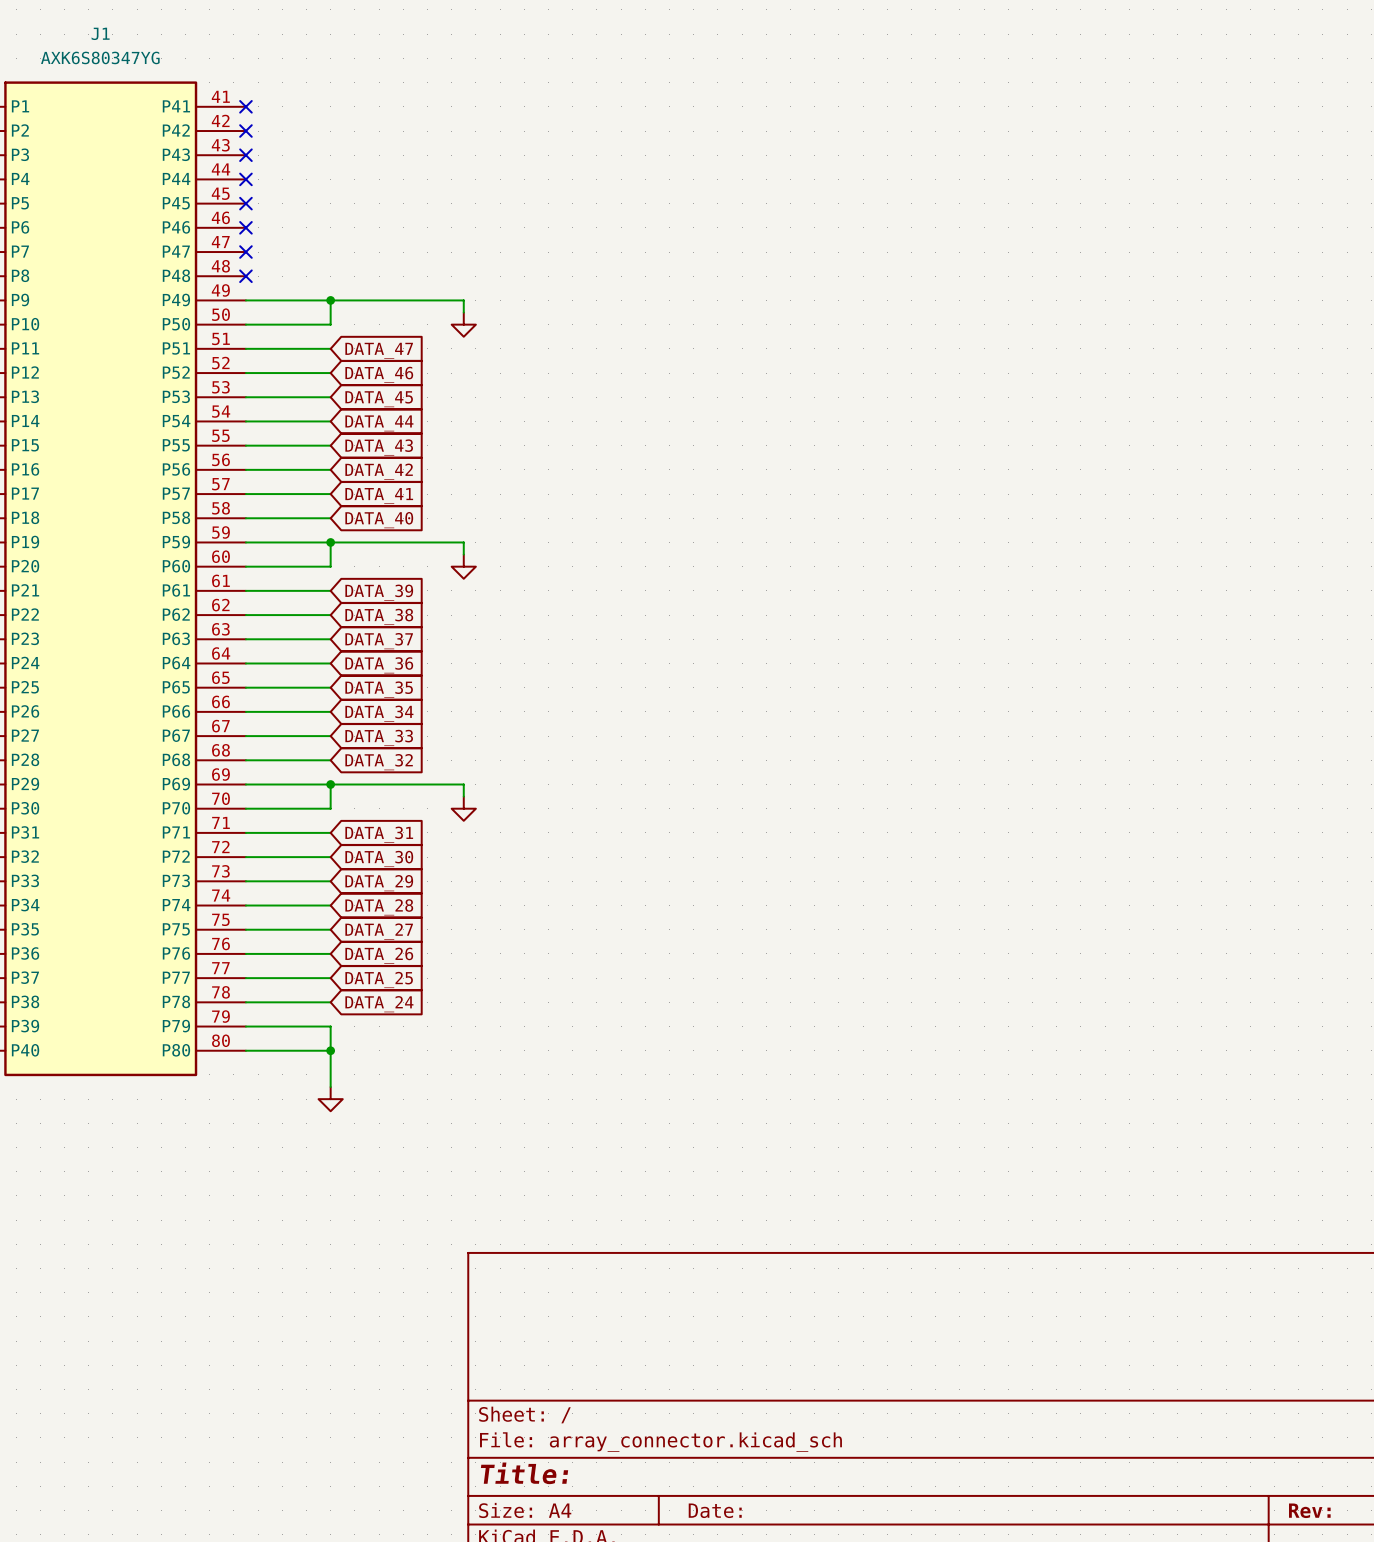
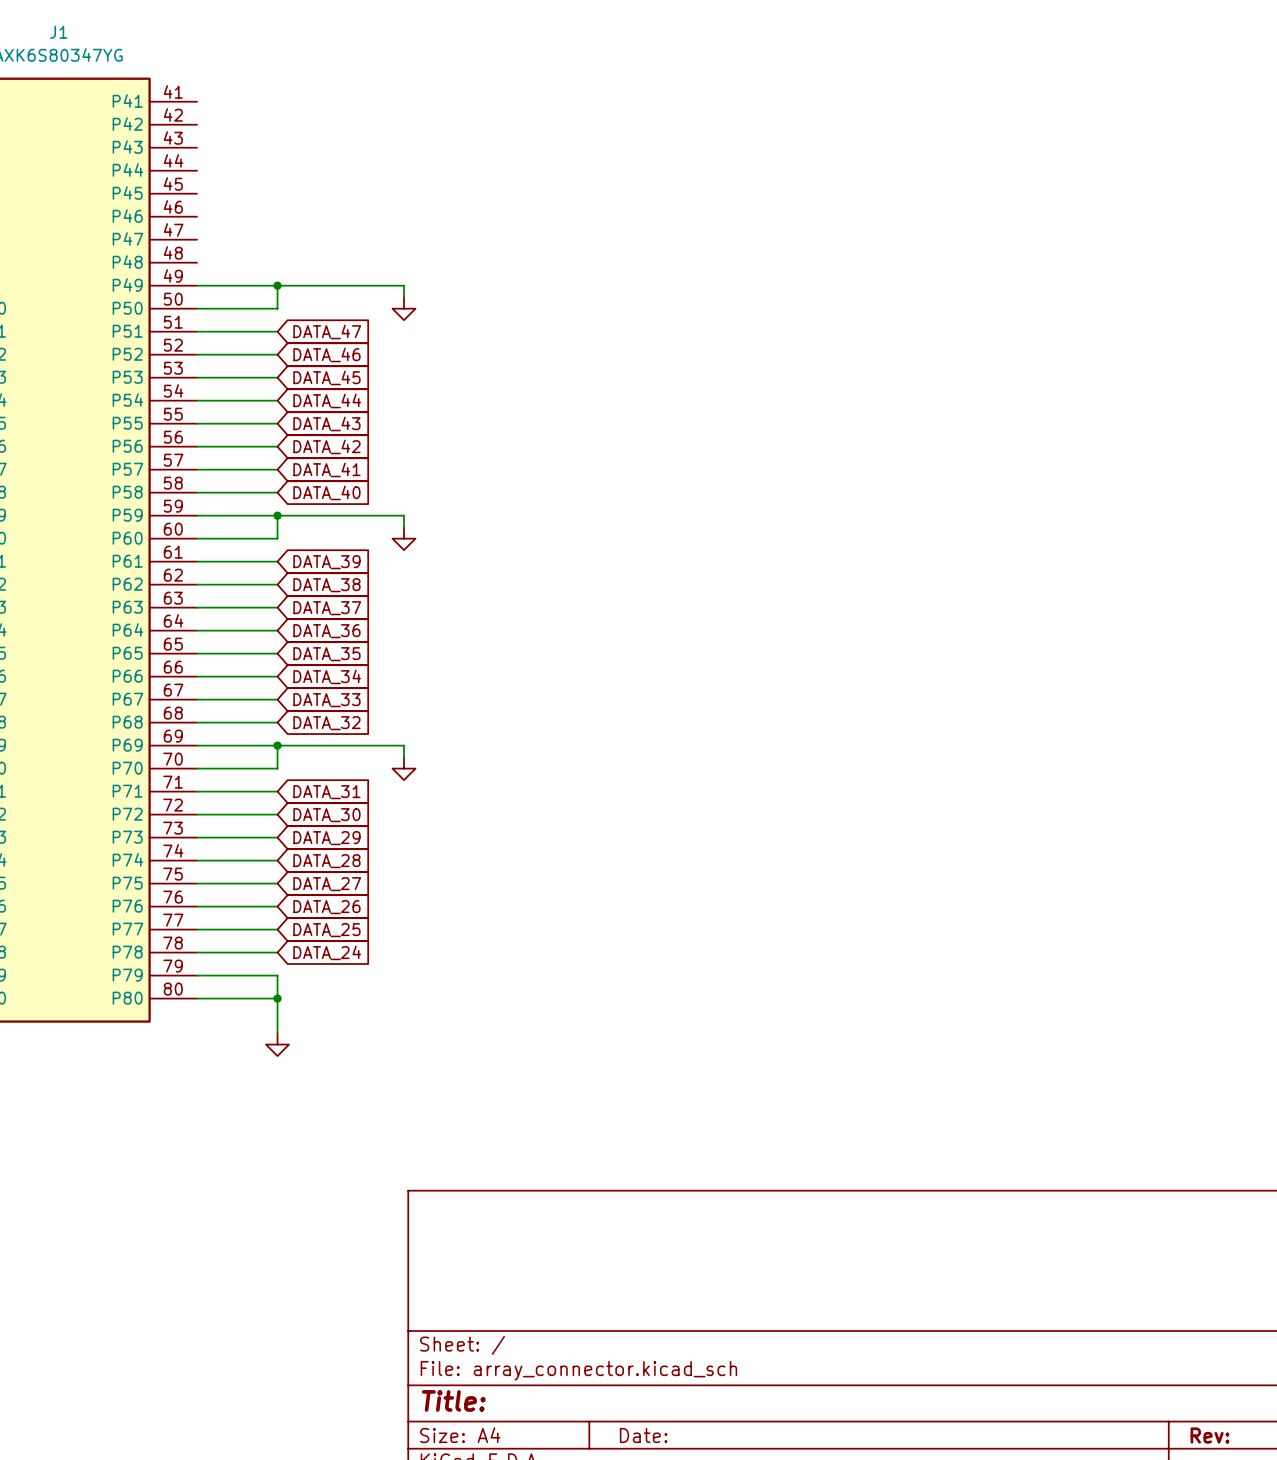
no-connect mark: (245, 106) -> none
no-connect mark: (245, 131) -> none
no-connect mark: (245, 155) -> none
no-connect mark: (245, 179) -> none
no-connect mark: (245, 203) -> none
no-connect mark: (245, 227) -> none
no-connect mark: (245, 252) -> none
no-connect mark: (245, 276) -> none

